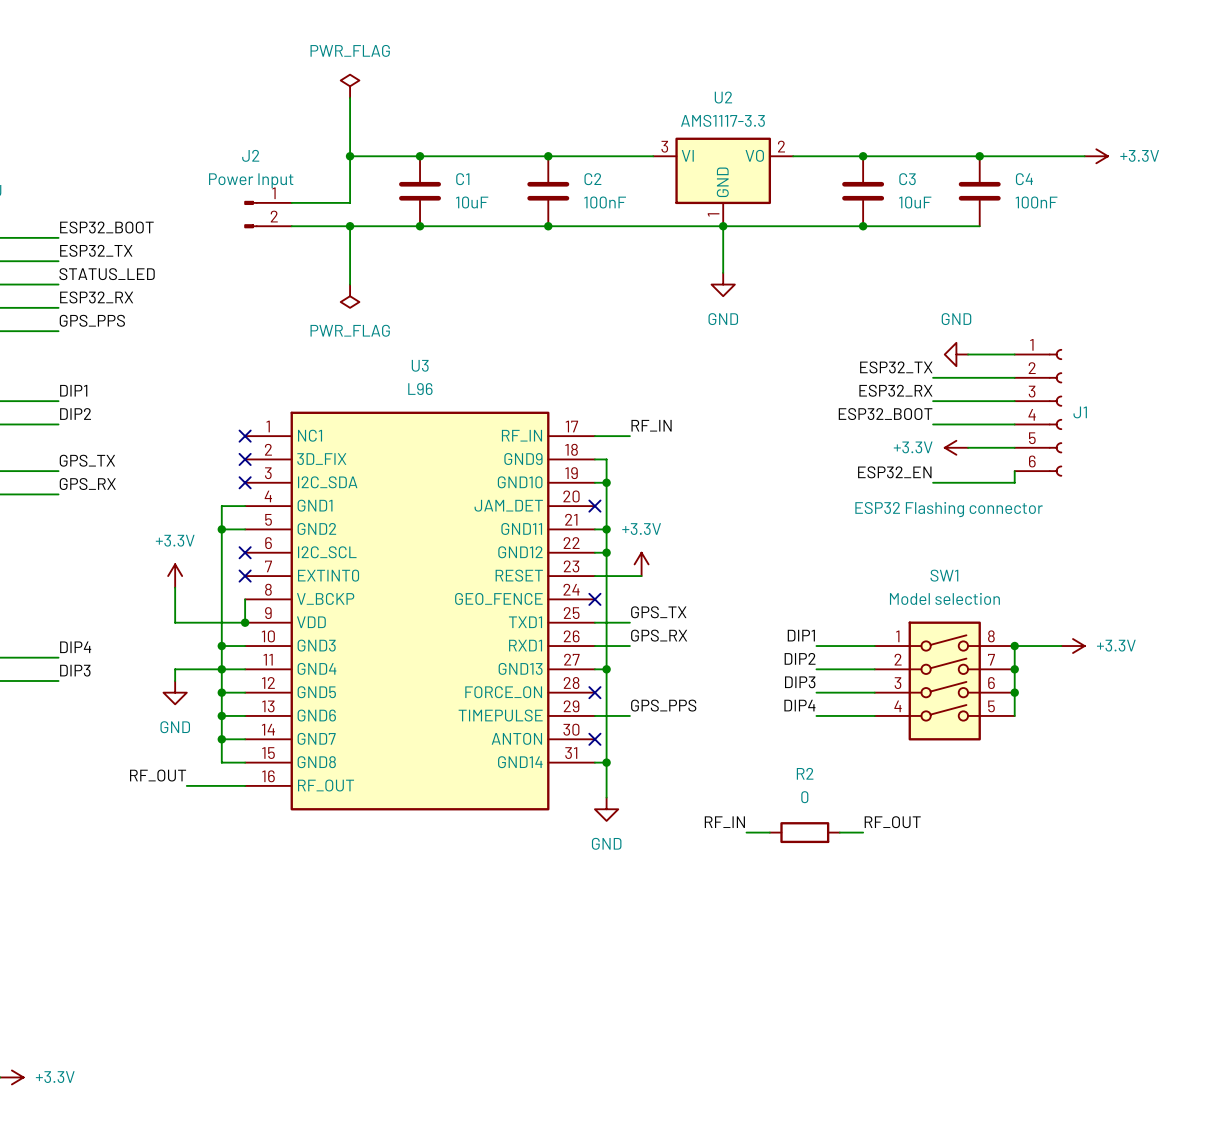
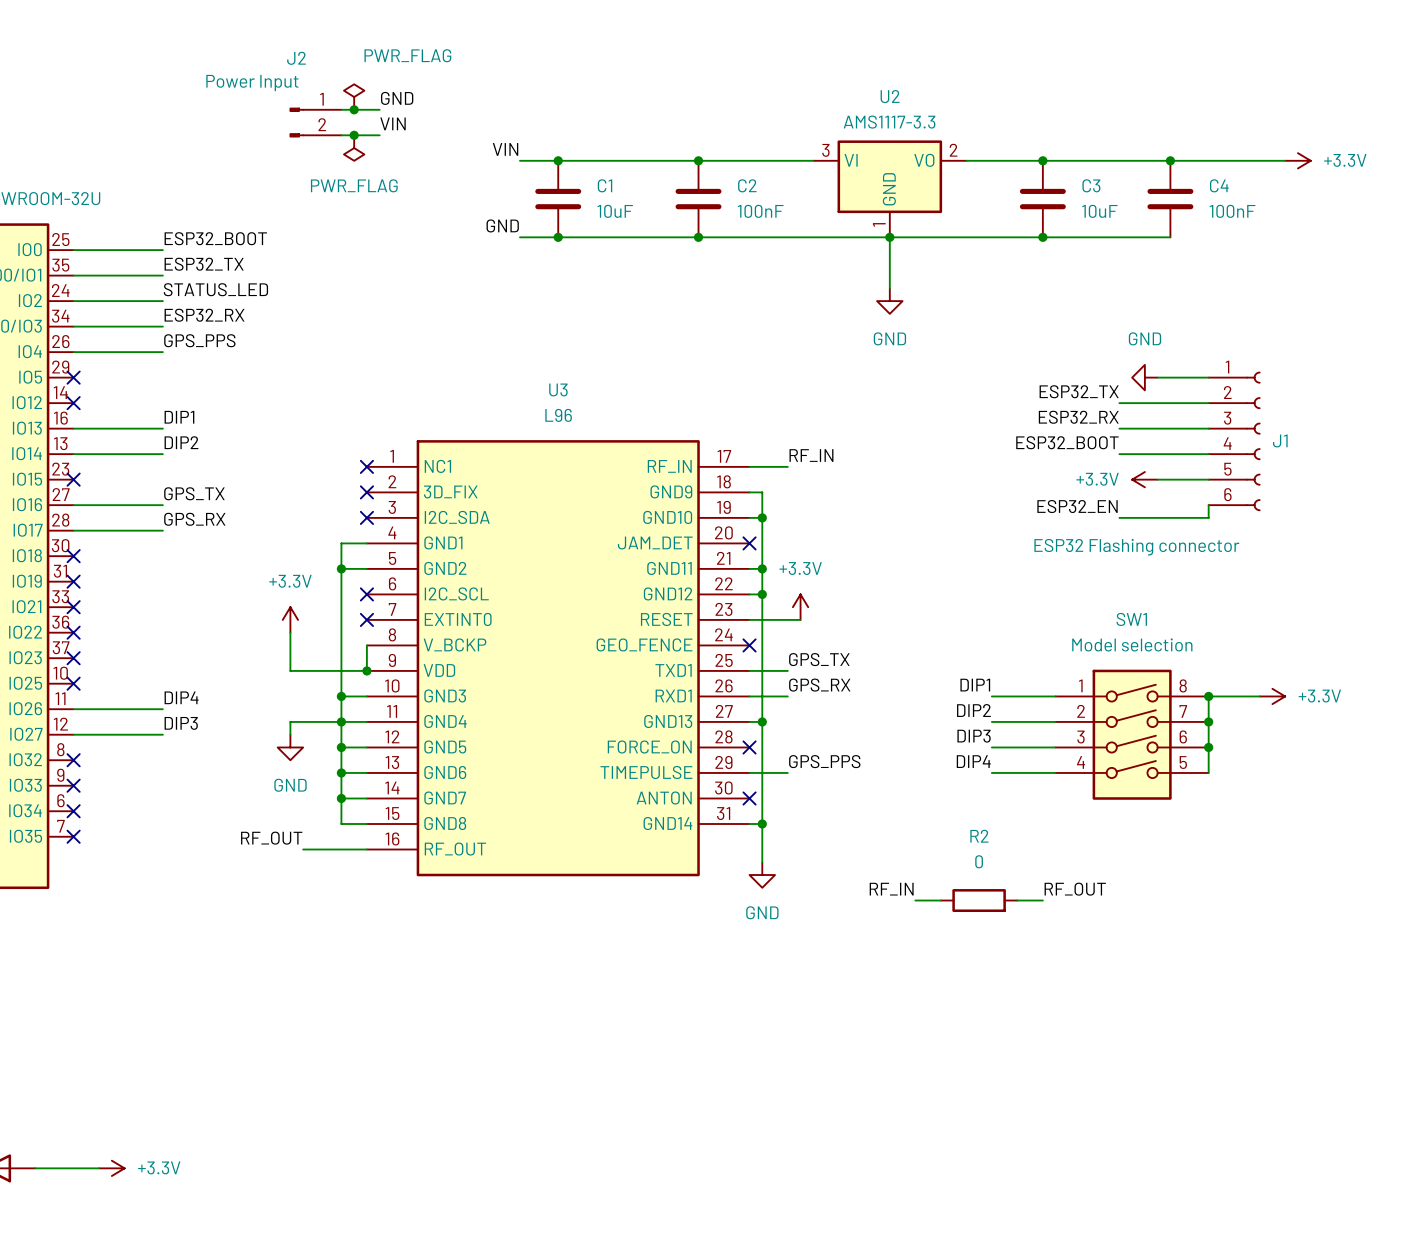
power symbol: PWR_FLAG (350, 86) -> none
power symbol: none -> PWR_FLAG (354, 97)
wire: (350, 97) (350, 202) (291, 202) -> none
label: none -> GND (397, 98)
wire: none -> (341, 109) (379, 109)
junction: none -> (354, 109)
label: none -> VIN (393, 123)
junction: none -> (354, 135)
power symbol: none -> PWR_FLAG (354, 148)
label: none -> VIN (505, 149)
wire: (350, 156) (385, 156) -> (341, 135) (379, 135)
junction: (350, 156) -> none
J2 value position: Power Input (251, 180) -> Power Input (252, 83)
J2 position: (268, 214) -> (315, 122)
label: none -> GND (502, 225)
wire: (291, 226) (385, 226) -> none
wire: (350, 226) (350, 284) -> none
junction: (350, 226) -> none
power symbol: PWR_FLAG (350, 296) -> none

